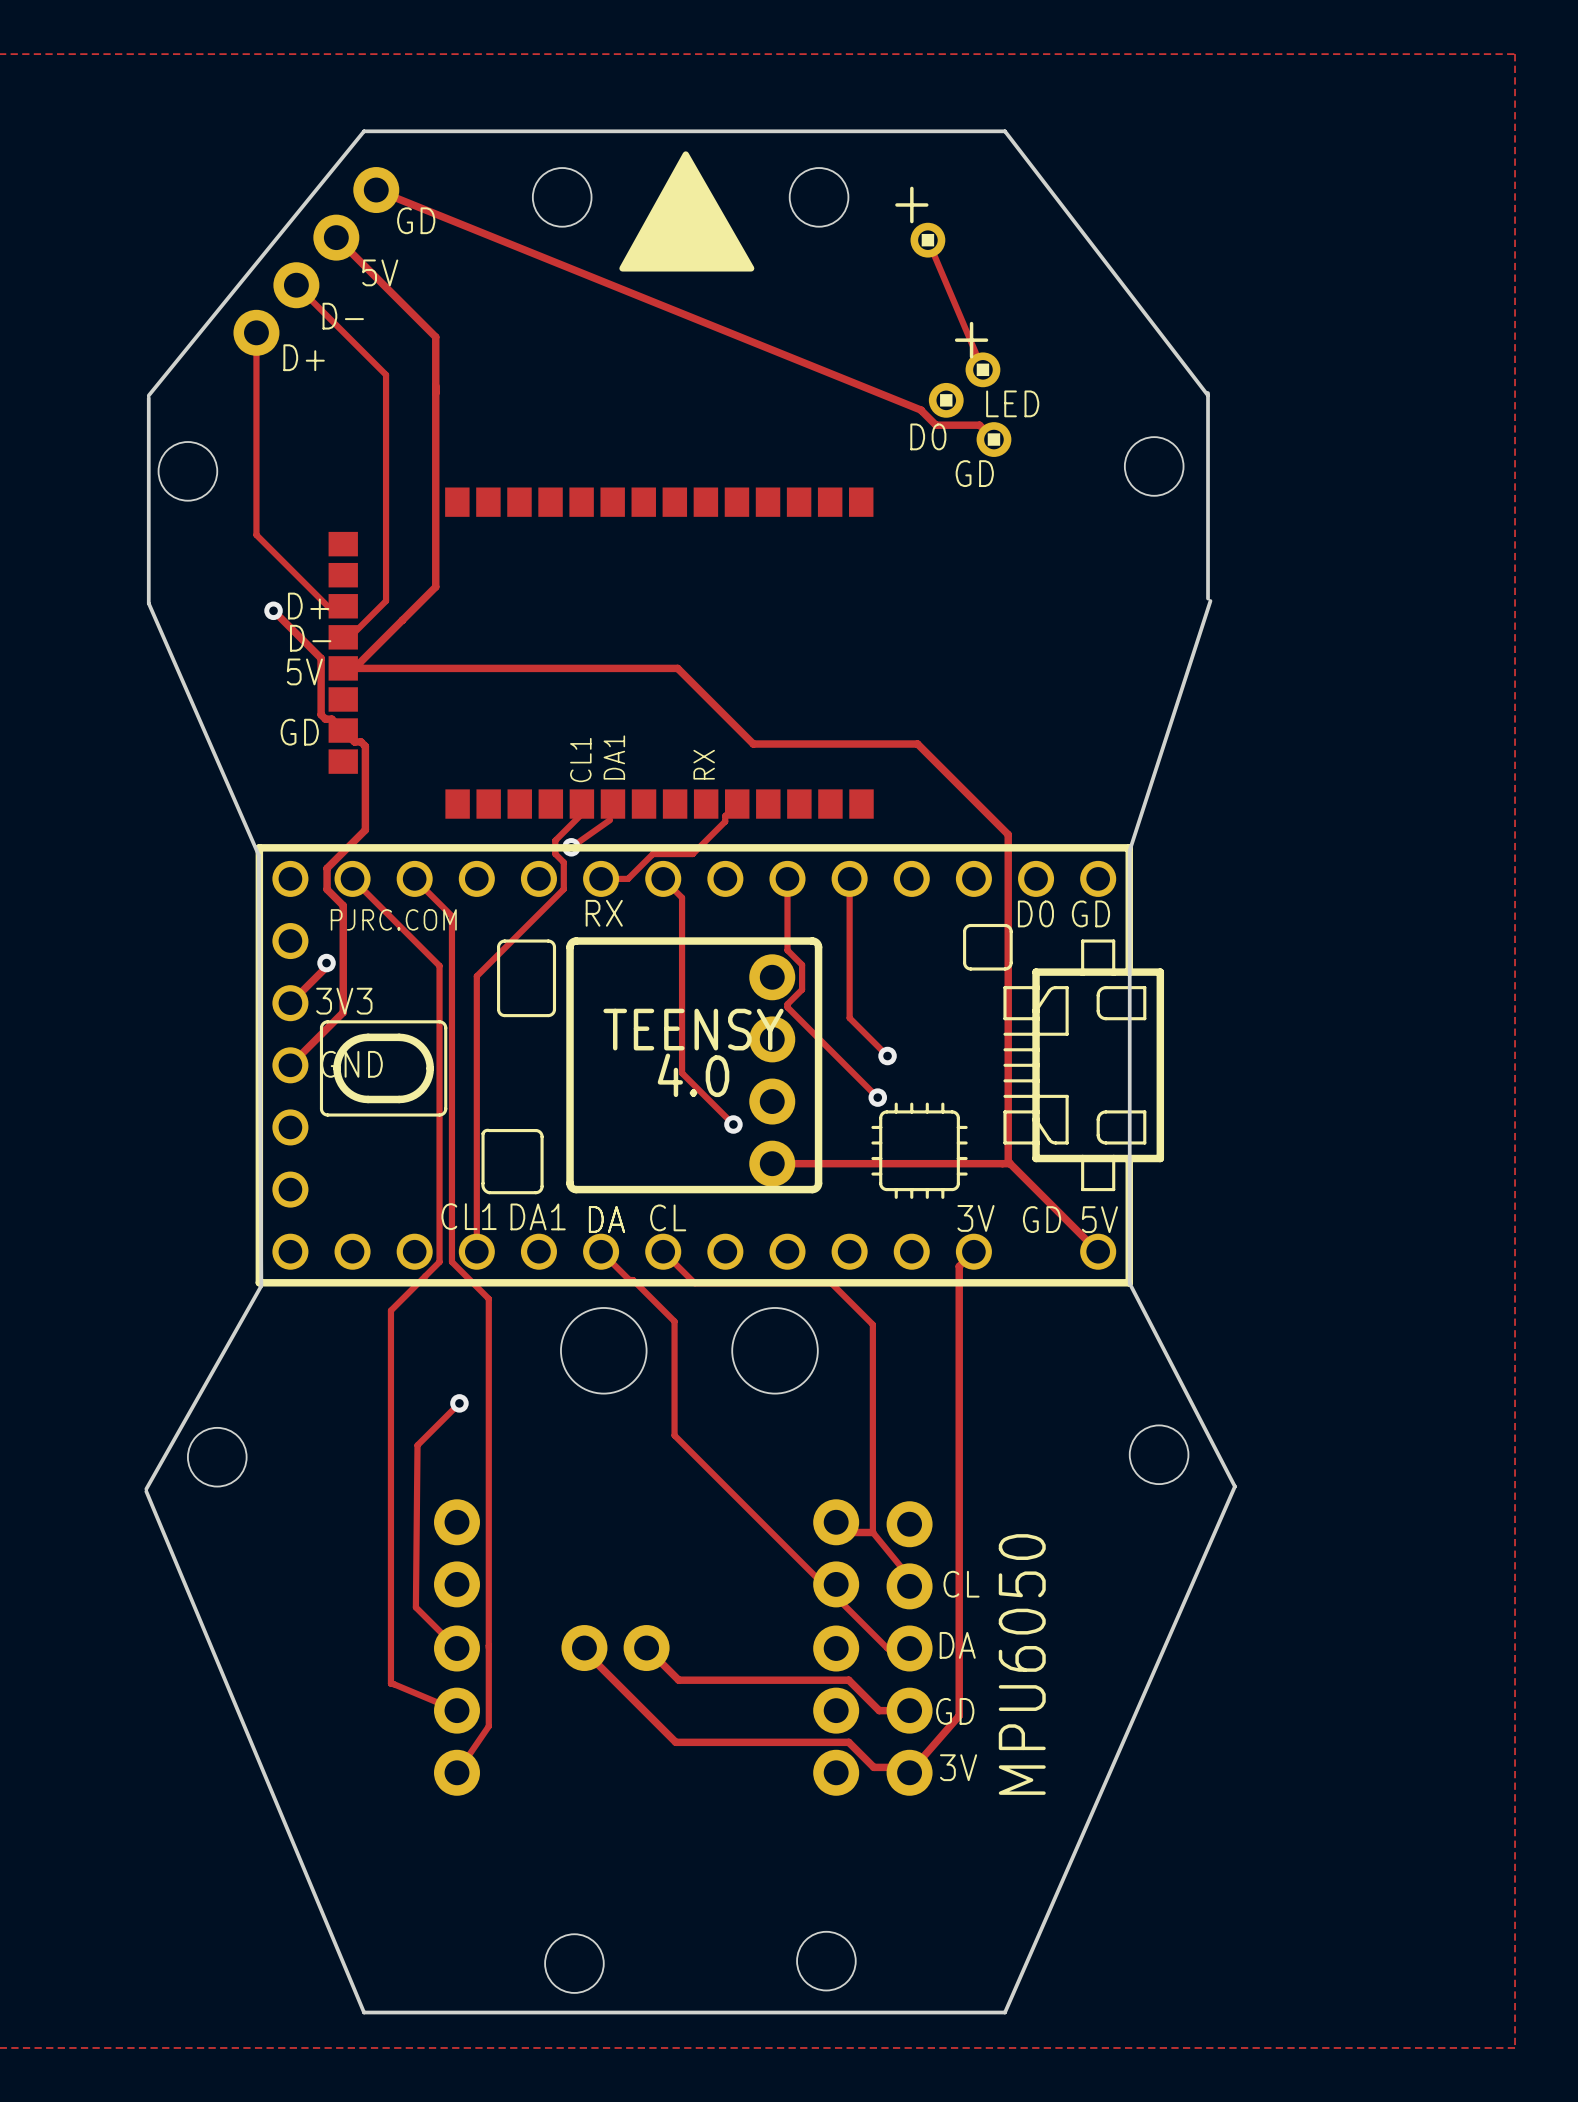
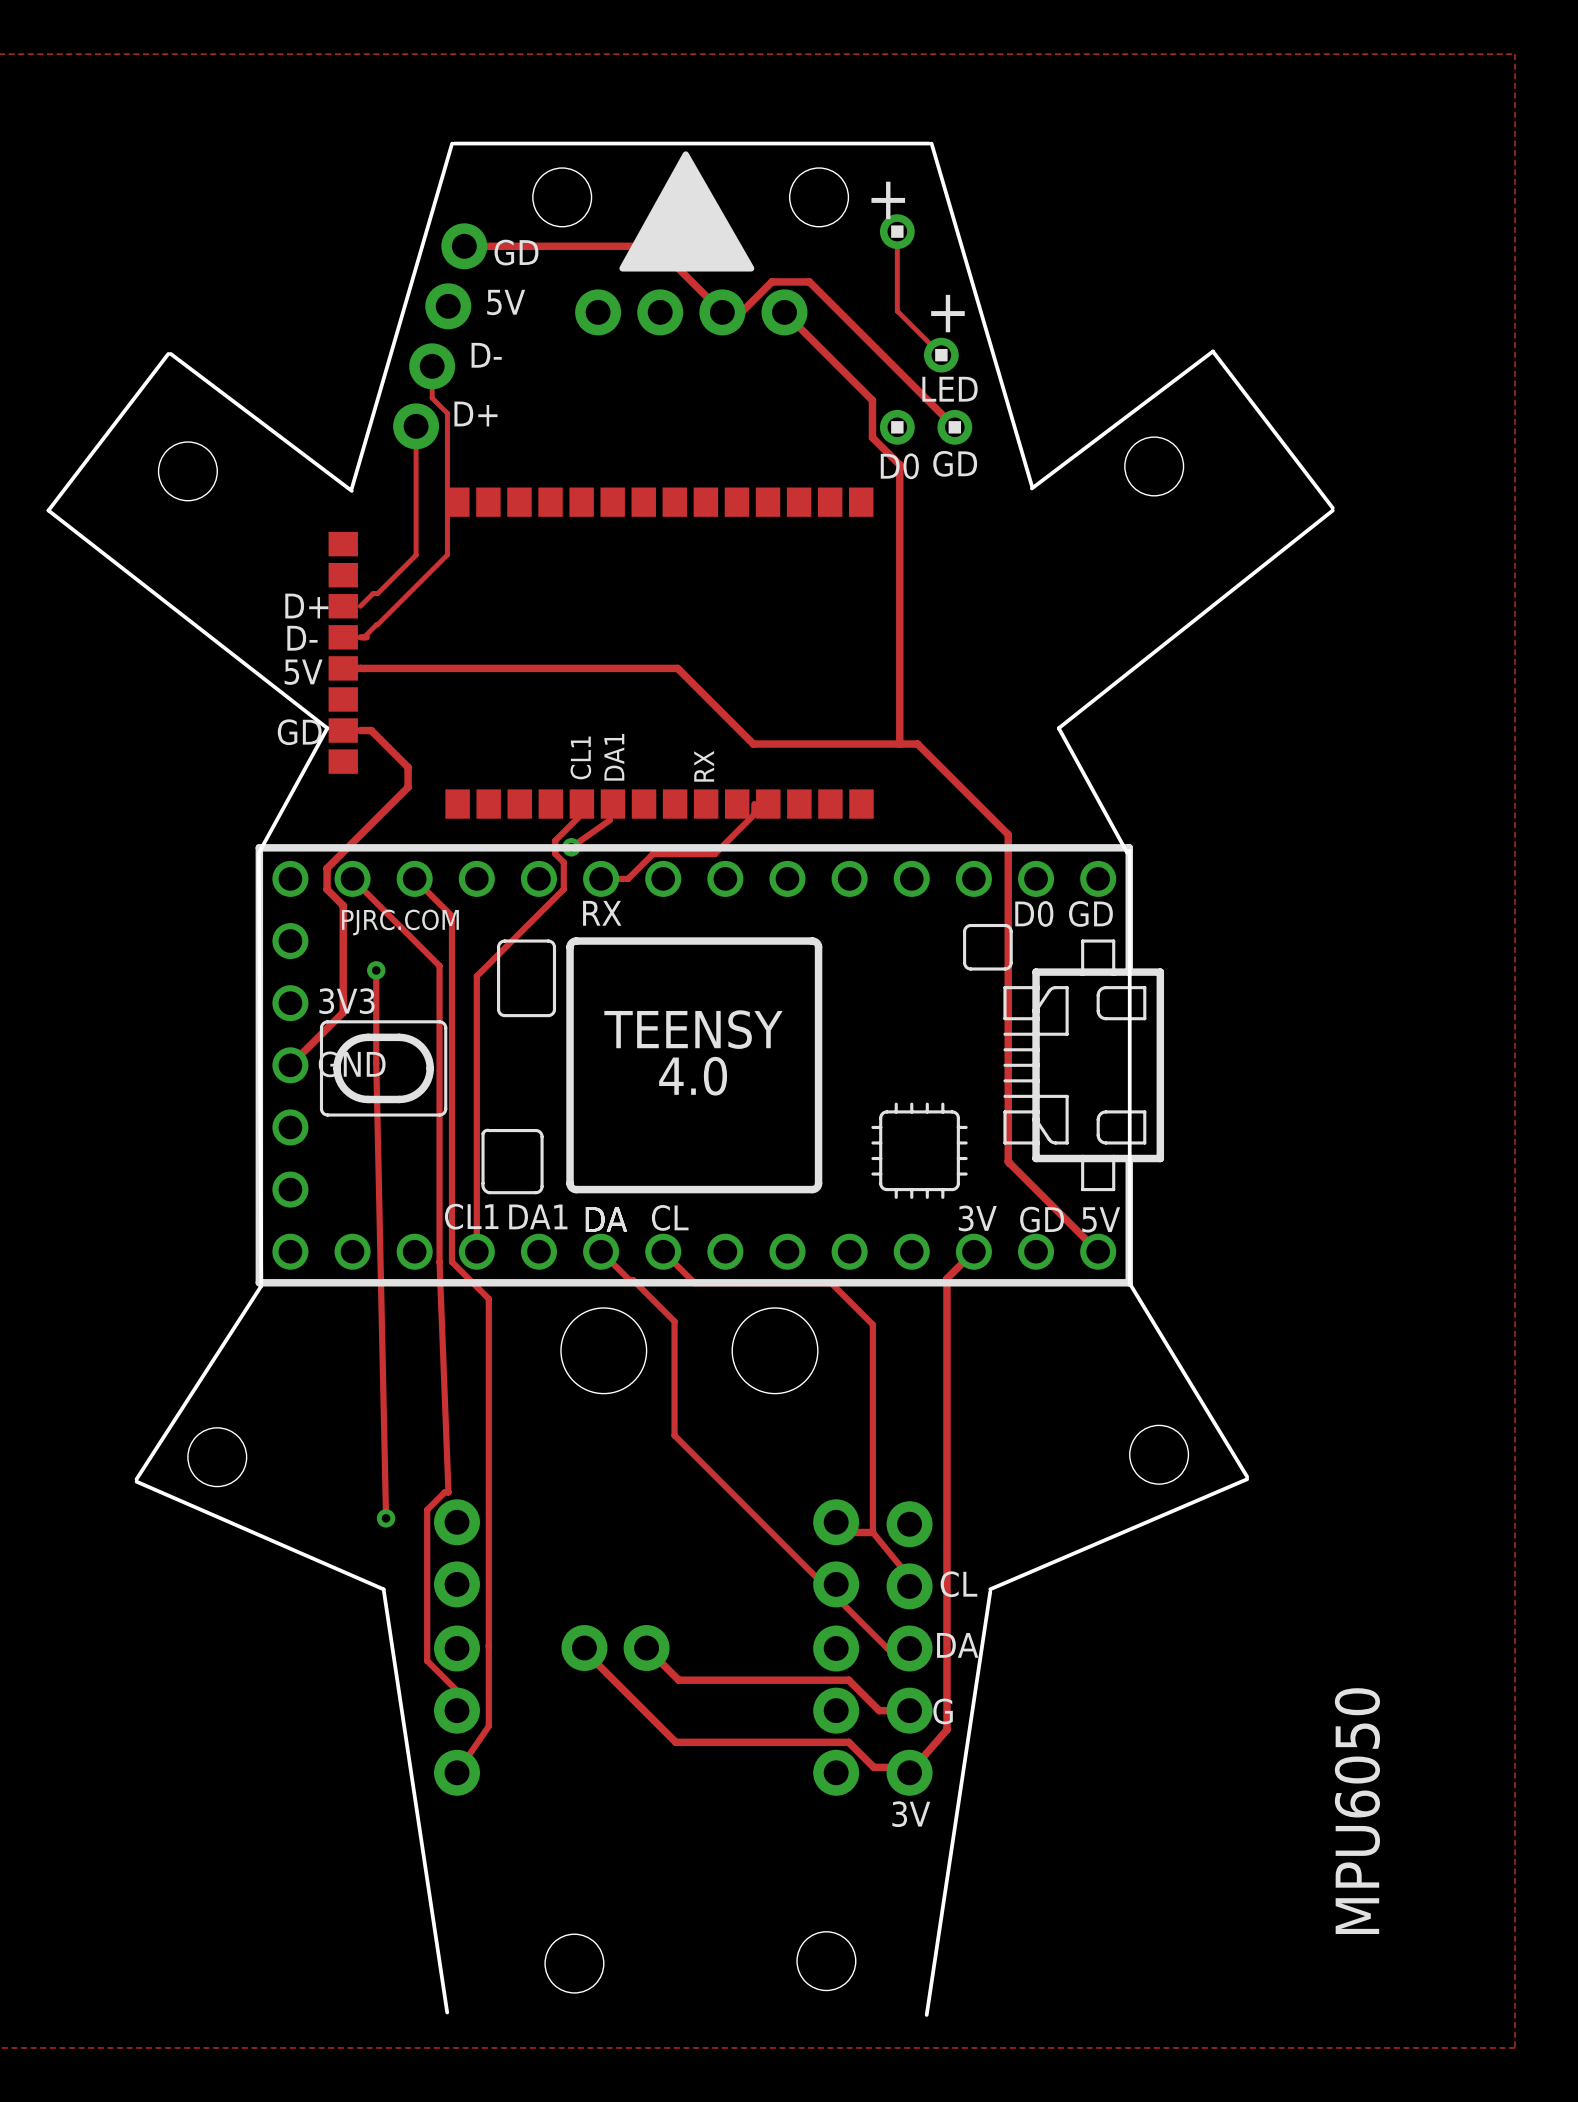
board edge: none -> (452, 143) (351, 488)
board edge: none -> (454, 143) (929, 143)
board edge: none -> (931, 143) (1031, 486)
track: (376, 190) (921, 410) -> none
text position: + (911, 204) -> + (888, 200)
text position: GD (416, 220) -> GD (516, 252)
track: none -> (897, 231) (897, 311) (941, 355)
track: (336, 237) (435, 337) (435, 586) (354, 668) (343, 668) -> none
track: (927, 240) (982, 369) -> none
part position: (927, 240) -> (897, 231)
track: none -> (464, 246) (656, 246) (722, 312) (741, 312) (771, 281) (809, 281) (954, 427)
part: (316, 261) -> none
text position: 5V (380, 272) -> 5V (506, 302)
track: (296, 285) (386, 374) (386, 601) (349, 637) (343, 637) -> none
part: none -> (691, 312)
track: none -> (784, 312) (872, 400) (872, 437) (899, 464) (899, 744)
text position: D- (343, 316) -> D- (486, 355)
track: (256, 332) (256, 535) (329, 608) -> none
part: none -> (440, 336)
text position: + (971, 340) -> + (947, 313)
board edge: none -> (168, 353) (48, 510) (327, 728) (258, 852)
board edge: none -> (170, 353) (351, 490)
part: none -> (941, 355)
text position: D+ (304, 357) -> D+ (475, 413)
track: none -> (432, 366) (432, 398) (447, 413) (447, 554) (364, 637)
part: (982, 369) -> none
board edge: (1208, 393) (1208, 598) -> none
board edge: (148, 395) (364, 131) (1004, 131) (1208, 395) -> none
board edge: (148, 397) (148, 603) (258, 855) -> none
part: (946, 400) -> none
text position: LED (1012, 403) -> LED (950, 389)
track: (921, 410) (935, 425) (979, 425) (993, 439) -> none
track: none -> (416, 426) (416, 555) (377, 593) (373, 593) (360, 606)
part: none -> (897, 427)
part: none -> (954, 427)
text position: D0 (928, 436) -> D0 (899, 466)
part: (993, 439) -> none
text position: GD (974, 473) -> GD (955, 463)
board edge: none -> (1031, 488) (1212, 351) (1332, 508)
board edge: none -> (1332, 510) (1058, 728) (1127, 852)
board edge: (1210, 601) (1129, 850) -> none
track: (273, 610) (321, 658) (321, 714) (325, 719) (331, 719) (354, 741) (361, 741) (365, 746) (365, 830) -> (360, 730) (371, 730) (408, 767) (408, 787) (365, 830)
via: (273, 610) -> none
track: none -> (360, 637) (366, 637)
track: (737, 804) (725, 816) (725, 821) (692, 854) -> (754, 804) (754, 814) (714, 854) (692, 854)
part footprint: [255, 844, 1165, 1287] -> [255, 844, 1165, 1287]
track: (663, 878) (682, 897) (682, 1073) (733, 1124) -> none
track: (787, 878) (787, 950) (802, 964) (802, 989) (787, 1004) (787, 1007) (877, 1097) -> none
track: (849, 878) (849, 1018) (887, 1056) -> none
track: (326, 963) (326, 967) (290, 1003) -> none
via position: (326, 963) -> (376, 970)
track: none -> (376, 970) (376, 1063) (386, 1518)
via: (887, 1056) -> none
part: (772, 1070) -> none
via: (877, 1097) -> none
via: (733, 1124) -> none
track: (772, 1163) (1009, 1163) -> none
track: (439, 1262) (390, 1310) (390, 1683) (457, 1710) -> (439, 1262) (448, 1492) (444, 1492) (427, 1509) (427, 1660) (457, 1690) (457, 1710)
track: (959, 1266) (959, 1715) (946, 1729) -> (959, 1266) (946, 1278) (946, 1729)
board edge: (1129, 1283) (1234, 1486) (1004, 2012) (364, 2012) (146, 1491) -> (1129, 1283) (1247, 1476)
board edge: (261, 1285) (146, 1489) -> (261, 1285) (136, 1479)
track: (459, 1403) (417, 1445) (415, 1607) (457, 1648) -> none
via position: (459, 1403) -> (386, 1518)
board edge: none -> (1247, 1479) (990, 1589)
board edge: none -> (136, 1481) (383, 1589) (447, 2012)
board edge: none -> (990, 1591) (926, 2014)
text position: MPU6050 (1022, 1664) -> MPU6050 (1357, 1811)
text: GD (955, 1711) -> G (943, 1711)
text position: 3V (958, 1767) -> 3V (911, 1814)

